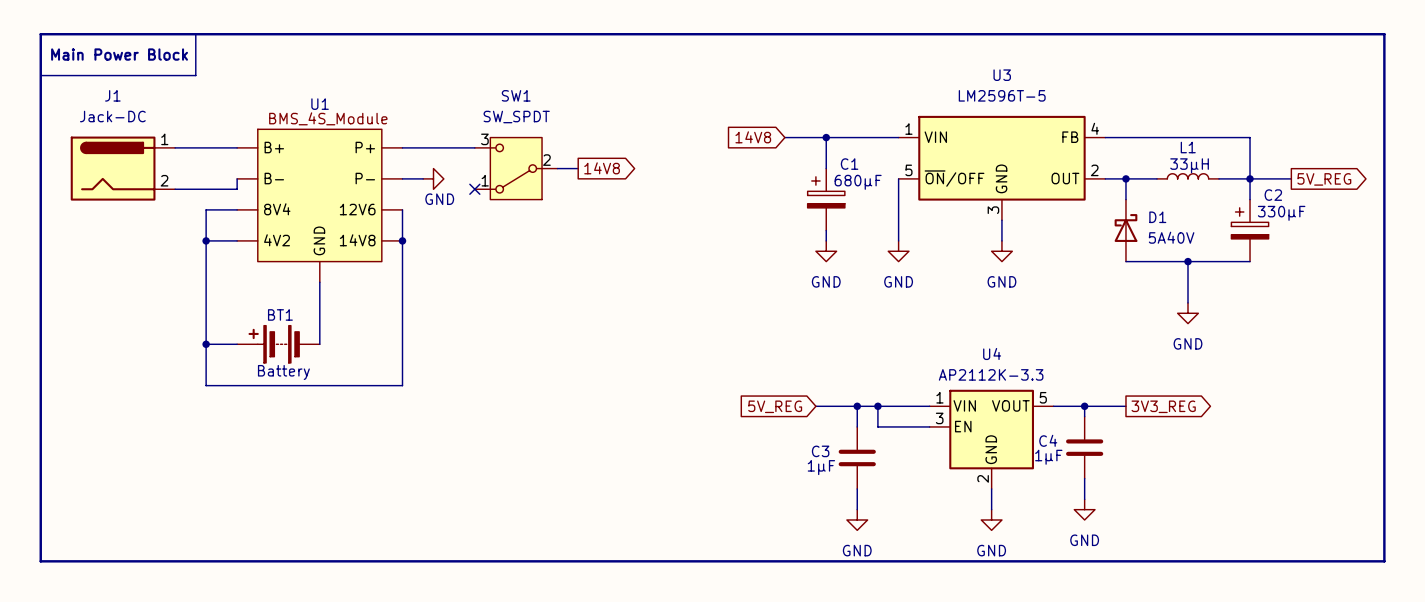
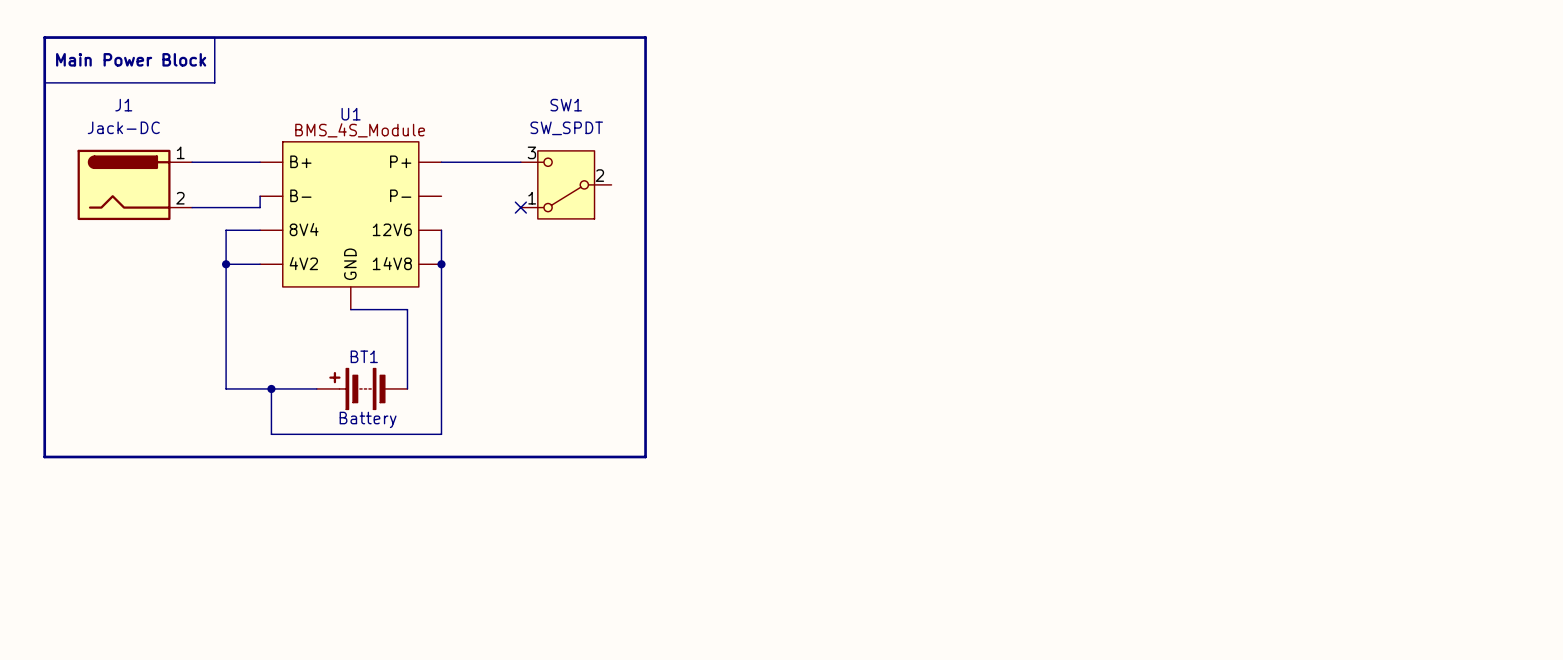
line: (588, 34) (1384, 34) (1384, 561) (40, 561) (40, 416) -> (645, 37) (645, 456) (44, 456)
global label: 14V8 (753, 137) -> none
wire: (784, 137) (898, 137) -> none
wire: (826, 137) (826, 168) -> none
junction: (826, 137) -> none
wire: (1105, 137) (1250, 137) (1250, 199) -> none
wire: (557, 168) (578, 168) -> none
global label: 14V8 (602, 168) -> none
U3: LM2596T-5 (1001, 168) -> none
L1: 33µH (1188, 176) -> none
wire: (402, 178) (423, 178) -> none
power symbol: GND (433, 178) -> none
wire: (898, 178) (898, 240) -> none
wire: (1105, 178) (1156, 178) -> none
wire: (1125, 178) (1125, 199) -> none
junction: (1125, 178) -> none
wire: (1219, 178) (1291, 178) -> none
junction: (1250, 178) -> none
global label: 5V_REG (1324, 179) -> none
C1: 680µF (826, 199) -> none
wire: (1001, 220) (1001, 240) -> none
wire: (826, 230) (826, 240) -> none
D1: 5A40V (1125, 230) -> none
C2: 330µF (1250, 230) -> none
power symbol: GND (826, 251) -> none
power symbol: GND (898, 251) -> none
power symbol: GND (1001, 251) -> none
wire: (1125, 261) (1250, 261) -> none
wire: (1188, 261) (1188, 302) -> none
junction: (1188, 261) -> none
wire: (319, 282) (319, 344) -> (350, 309) (407, 309) (407, 388)
power symbol: GND (1188, 313) -> none
wire: (206, 344) (237, 344) -> none
junction position: (206, 344) -> (271, 388)
BT1 position: (278, 344) -> (362, 388)
wire: (206, 354) (206, 385) (402, 385) -> (271, 388) (271, 434) (441, 434) (441, 422)
wire: none -> (226, 388) (316, 388)
global label: 5V_REG (775, 406) -> none
wire: (815, 406) (929, 406) -> none
wire: (857, 406) (857, 426) -> none
junction: (857, 406) -> none
wire: (877, 406) (877, 426) (929, 426) -> none
junction: (877, 406) -> none
wire: (1053, 406) (1125, 406) -> none
wire: (1084, 406) (1084, 416) -> none
junction: (1084, 406) -> none
global label: 3V3_REG (1163, 406) -> none
U4: AP2112K-3.3 (991, 439) -> none
C4: 1µF (1084, 447) -> none
C3: 1µF (857, 457) -> none
wire: (1084, 478) (1084, 499) -> none
wire: (857, 488) (857, 509) -> none
wire: (991, 488) (991, 509) -> none
power symbol: GND (1084, 509) -> none
power symbol: GND (857, 519) -> none
power symbol: GND (991, 519) -> none

